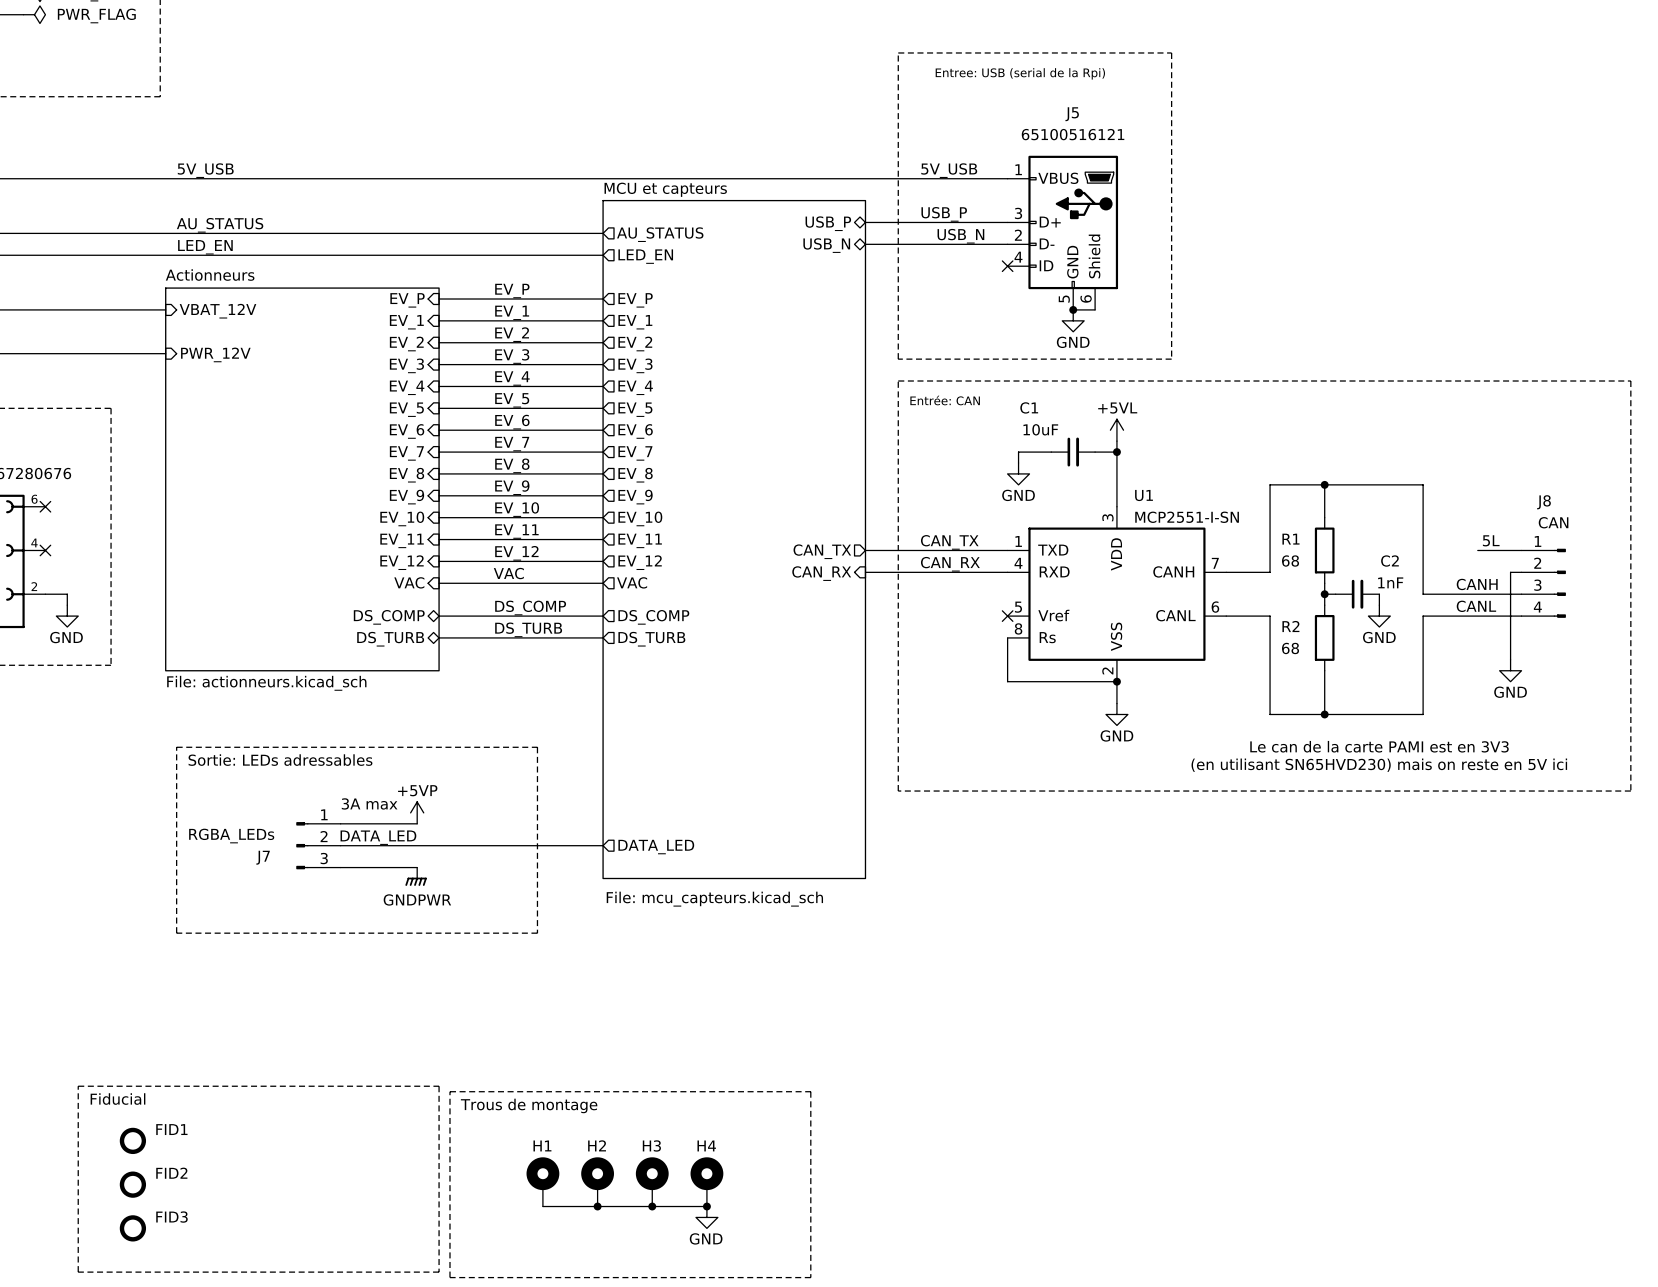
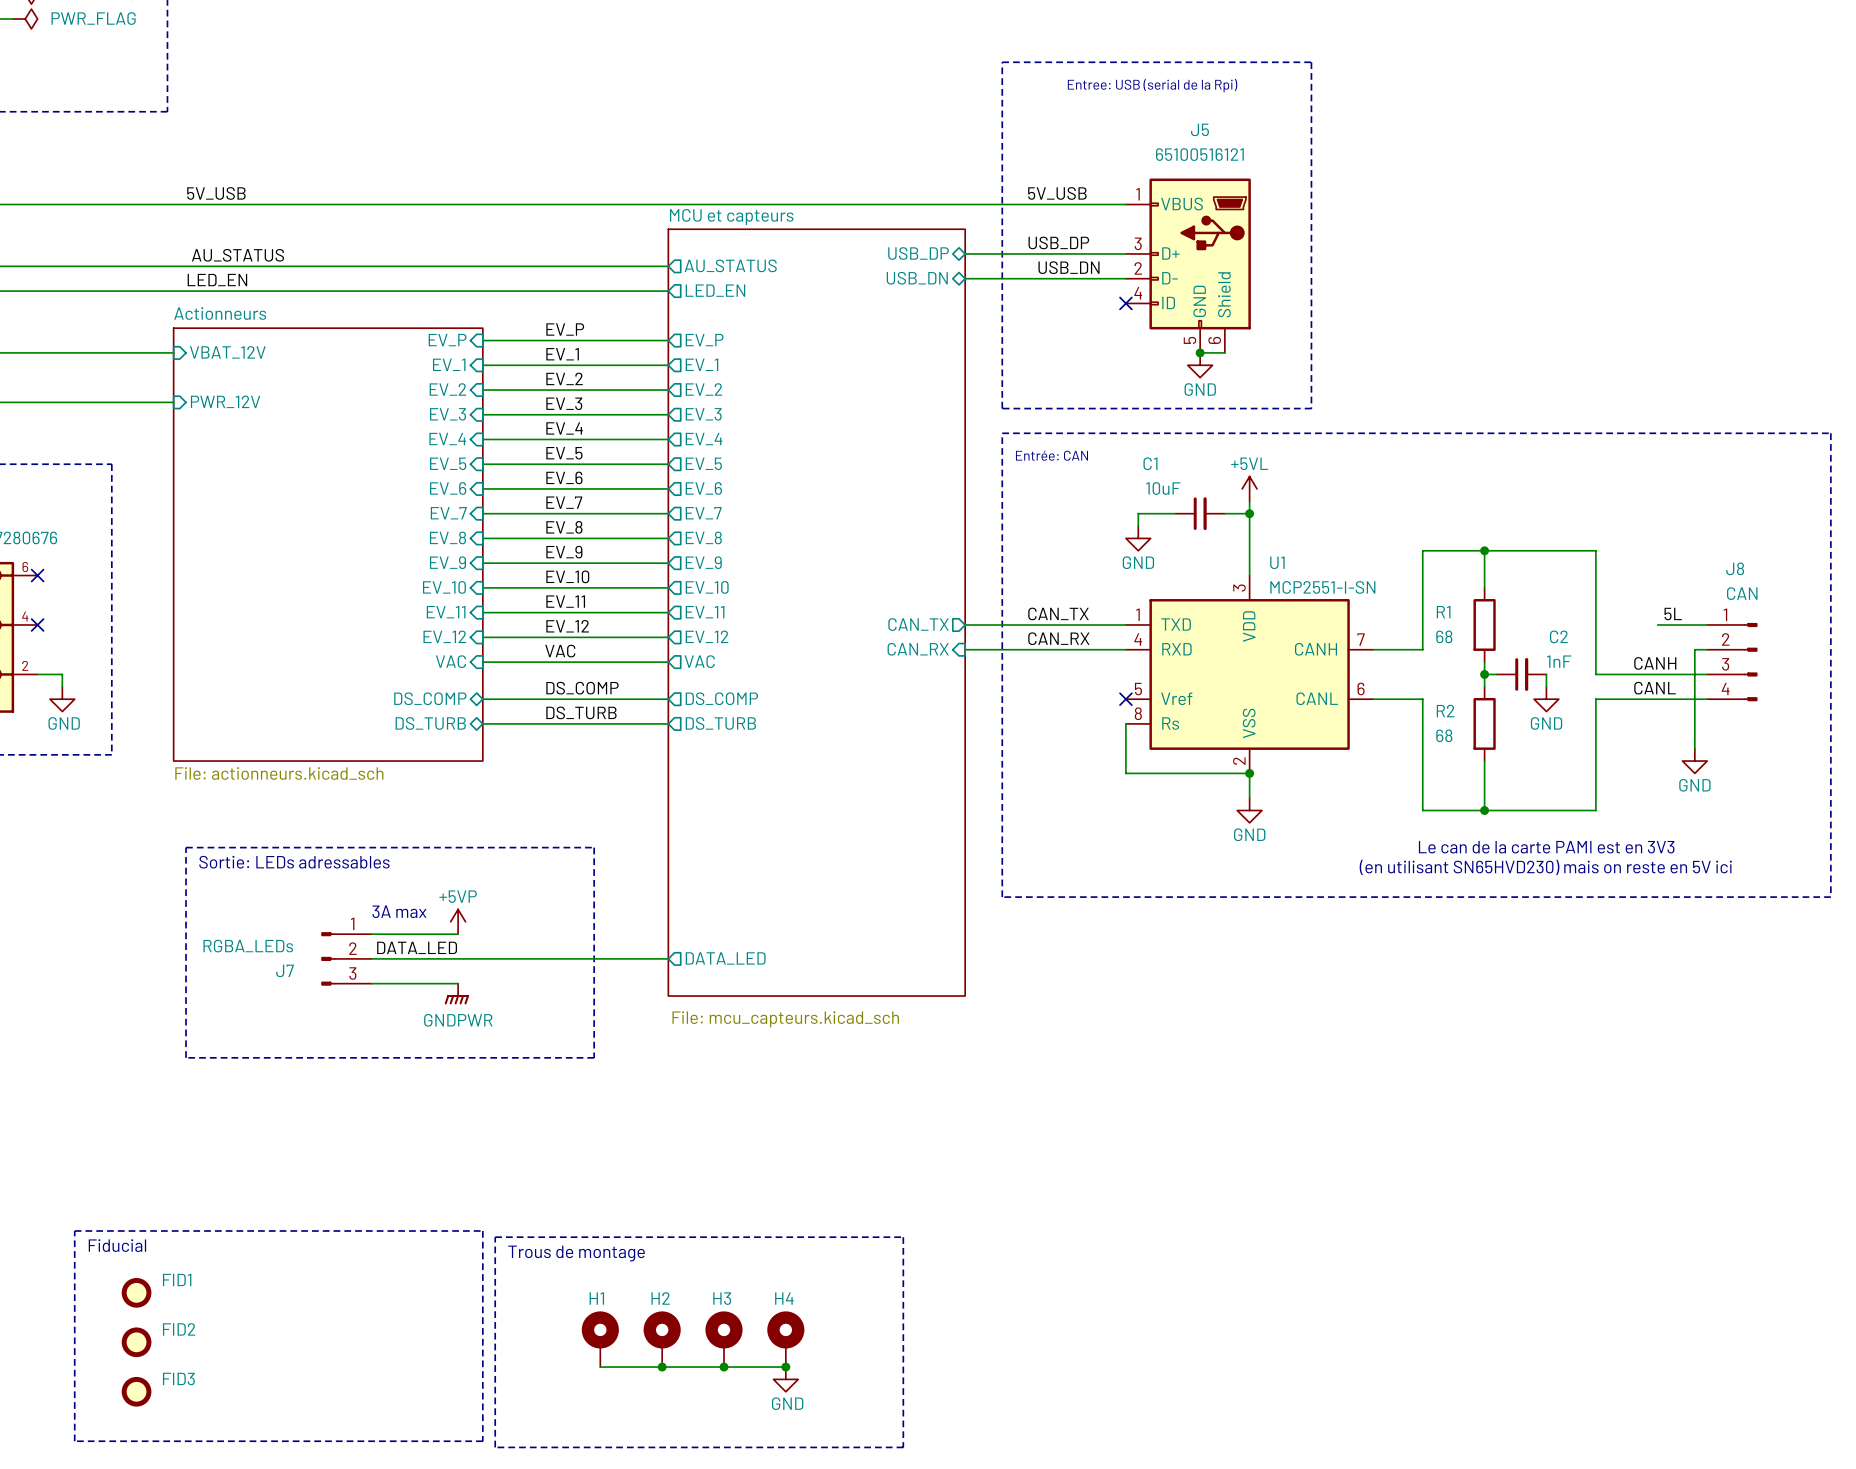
label: USB_P (944, 214) -> USB_DP (1058, 242)
sheet pin: USB_P (828, 223) -> USB_DP (918, 253)
label: USB_N (960, 236) -> USB_DN (1069, 267)
sheet pin: USB_N (826, 245) -> USB_DN (917, 278)

